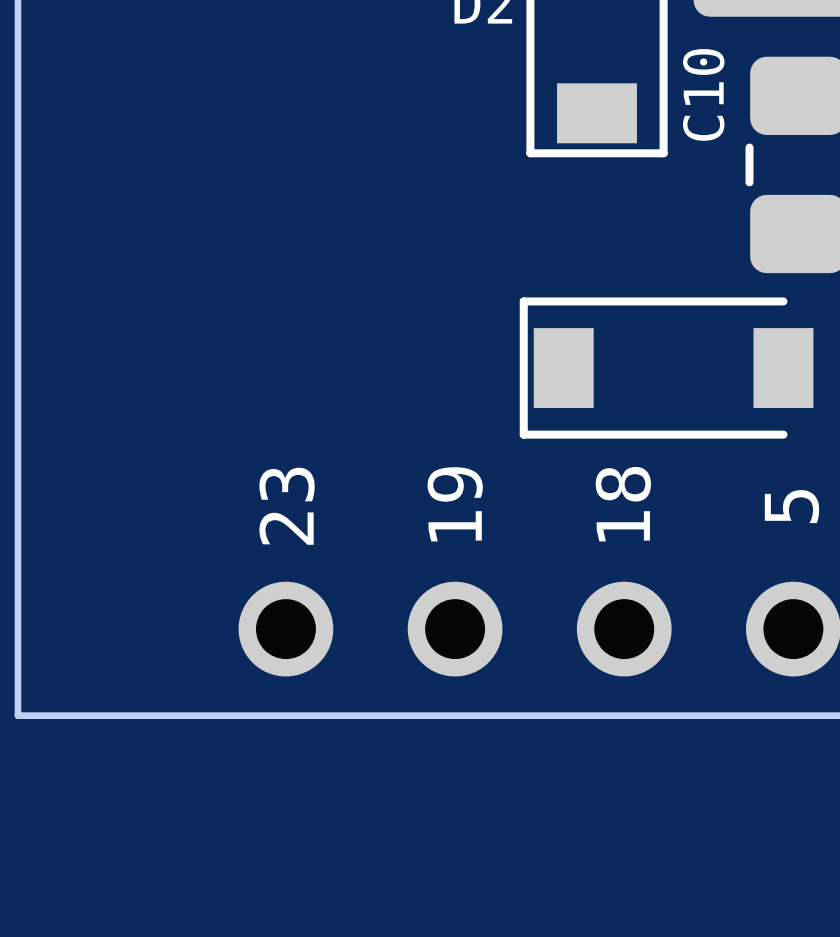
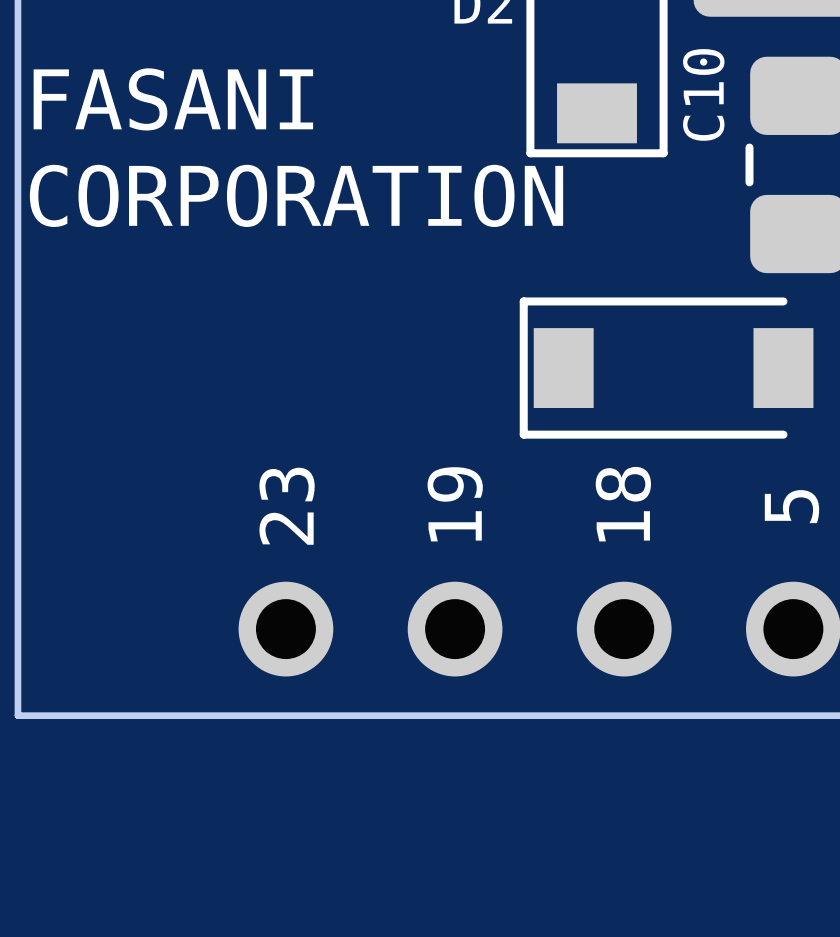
text: none -> FASANI (173, 99)
text: none -> CORPORATION (296, 195)

